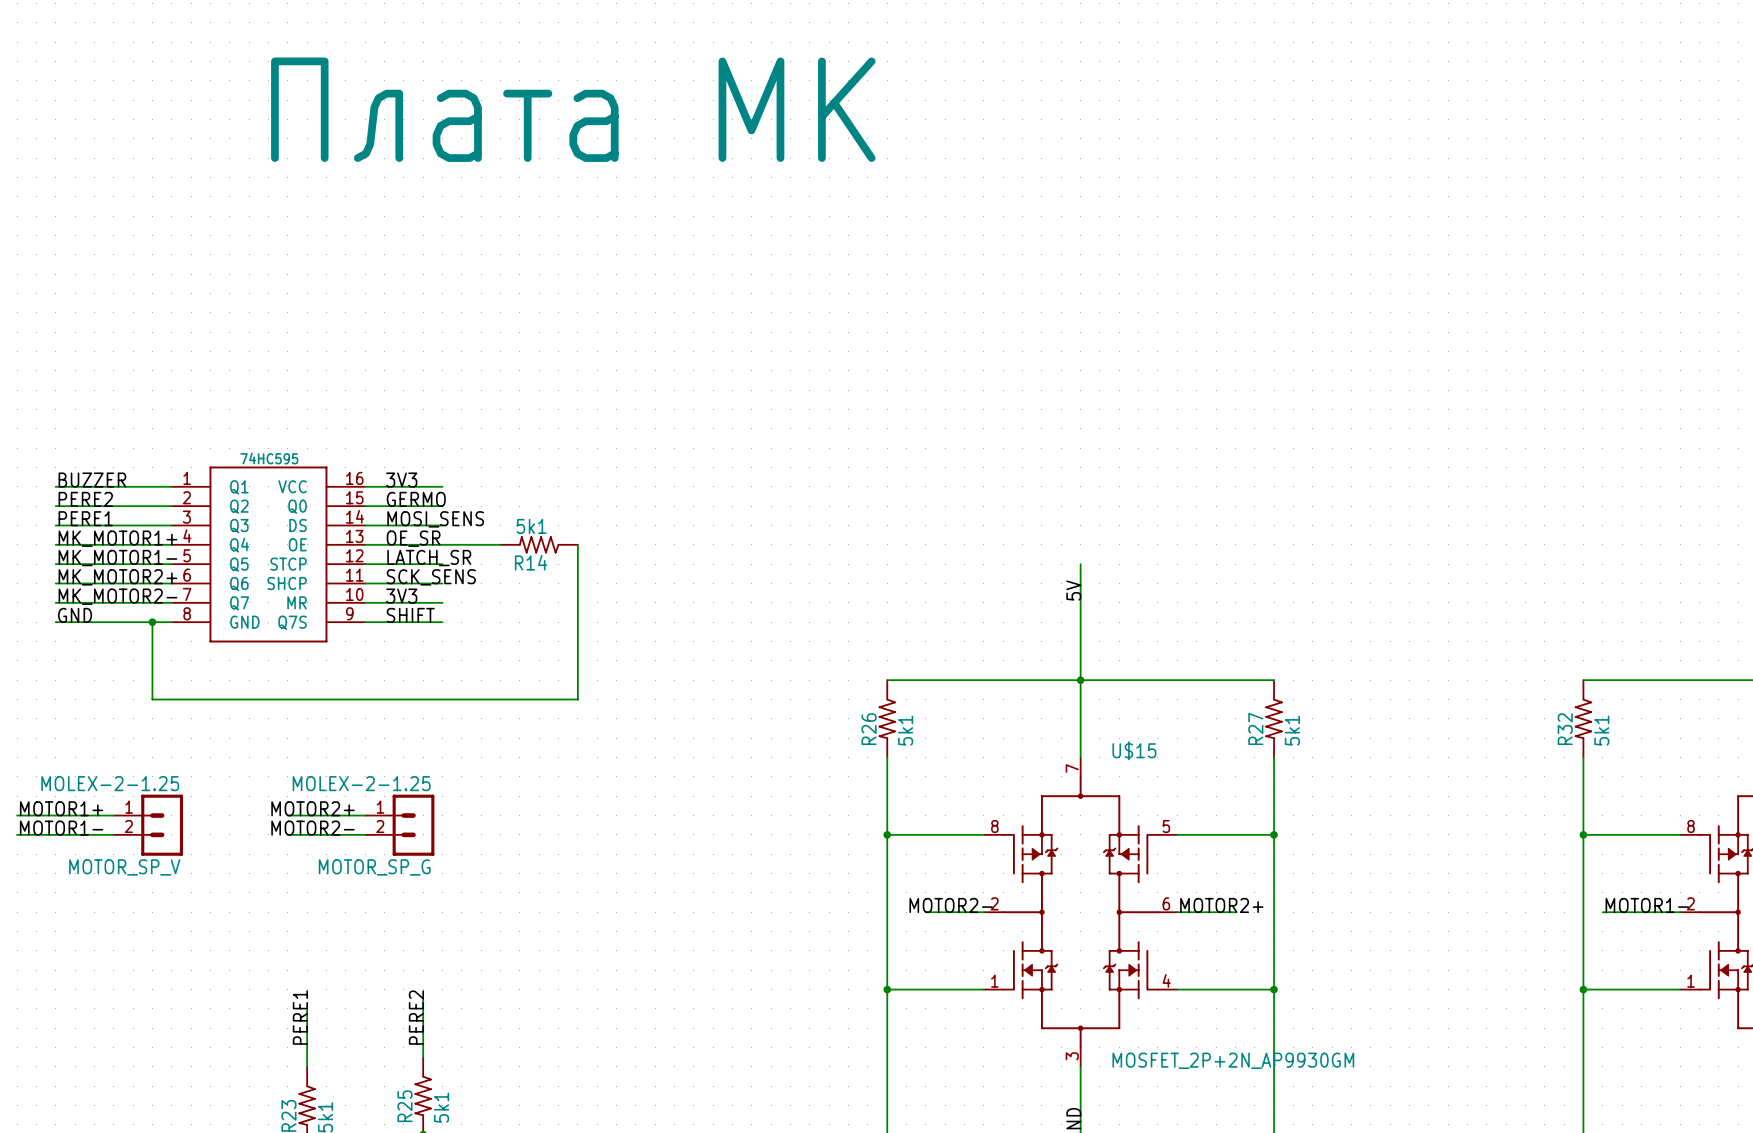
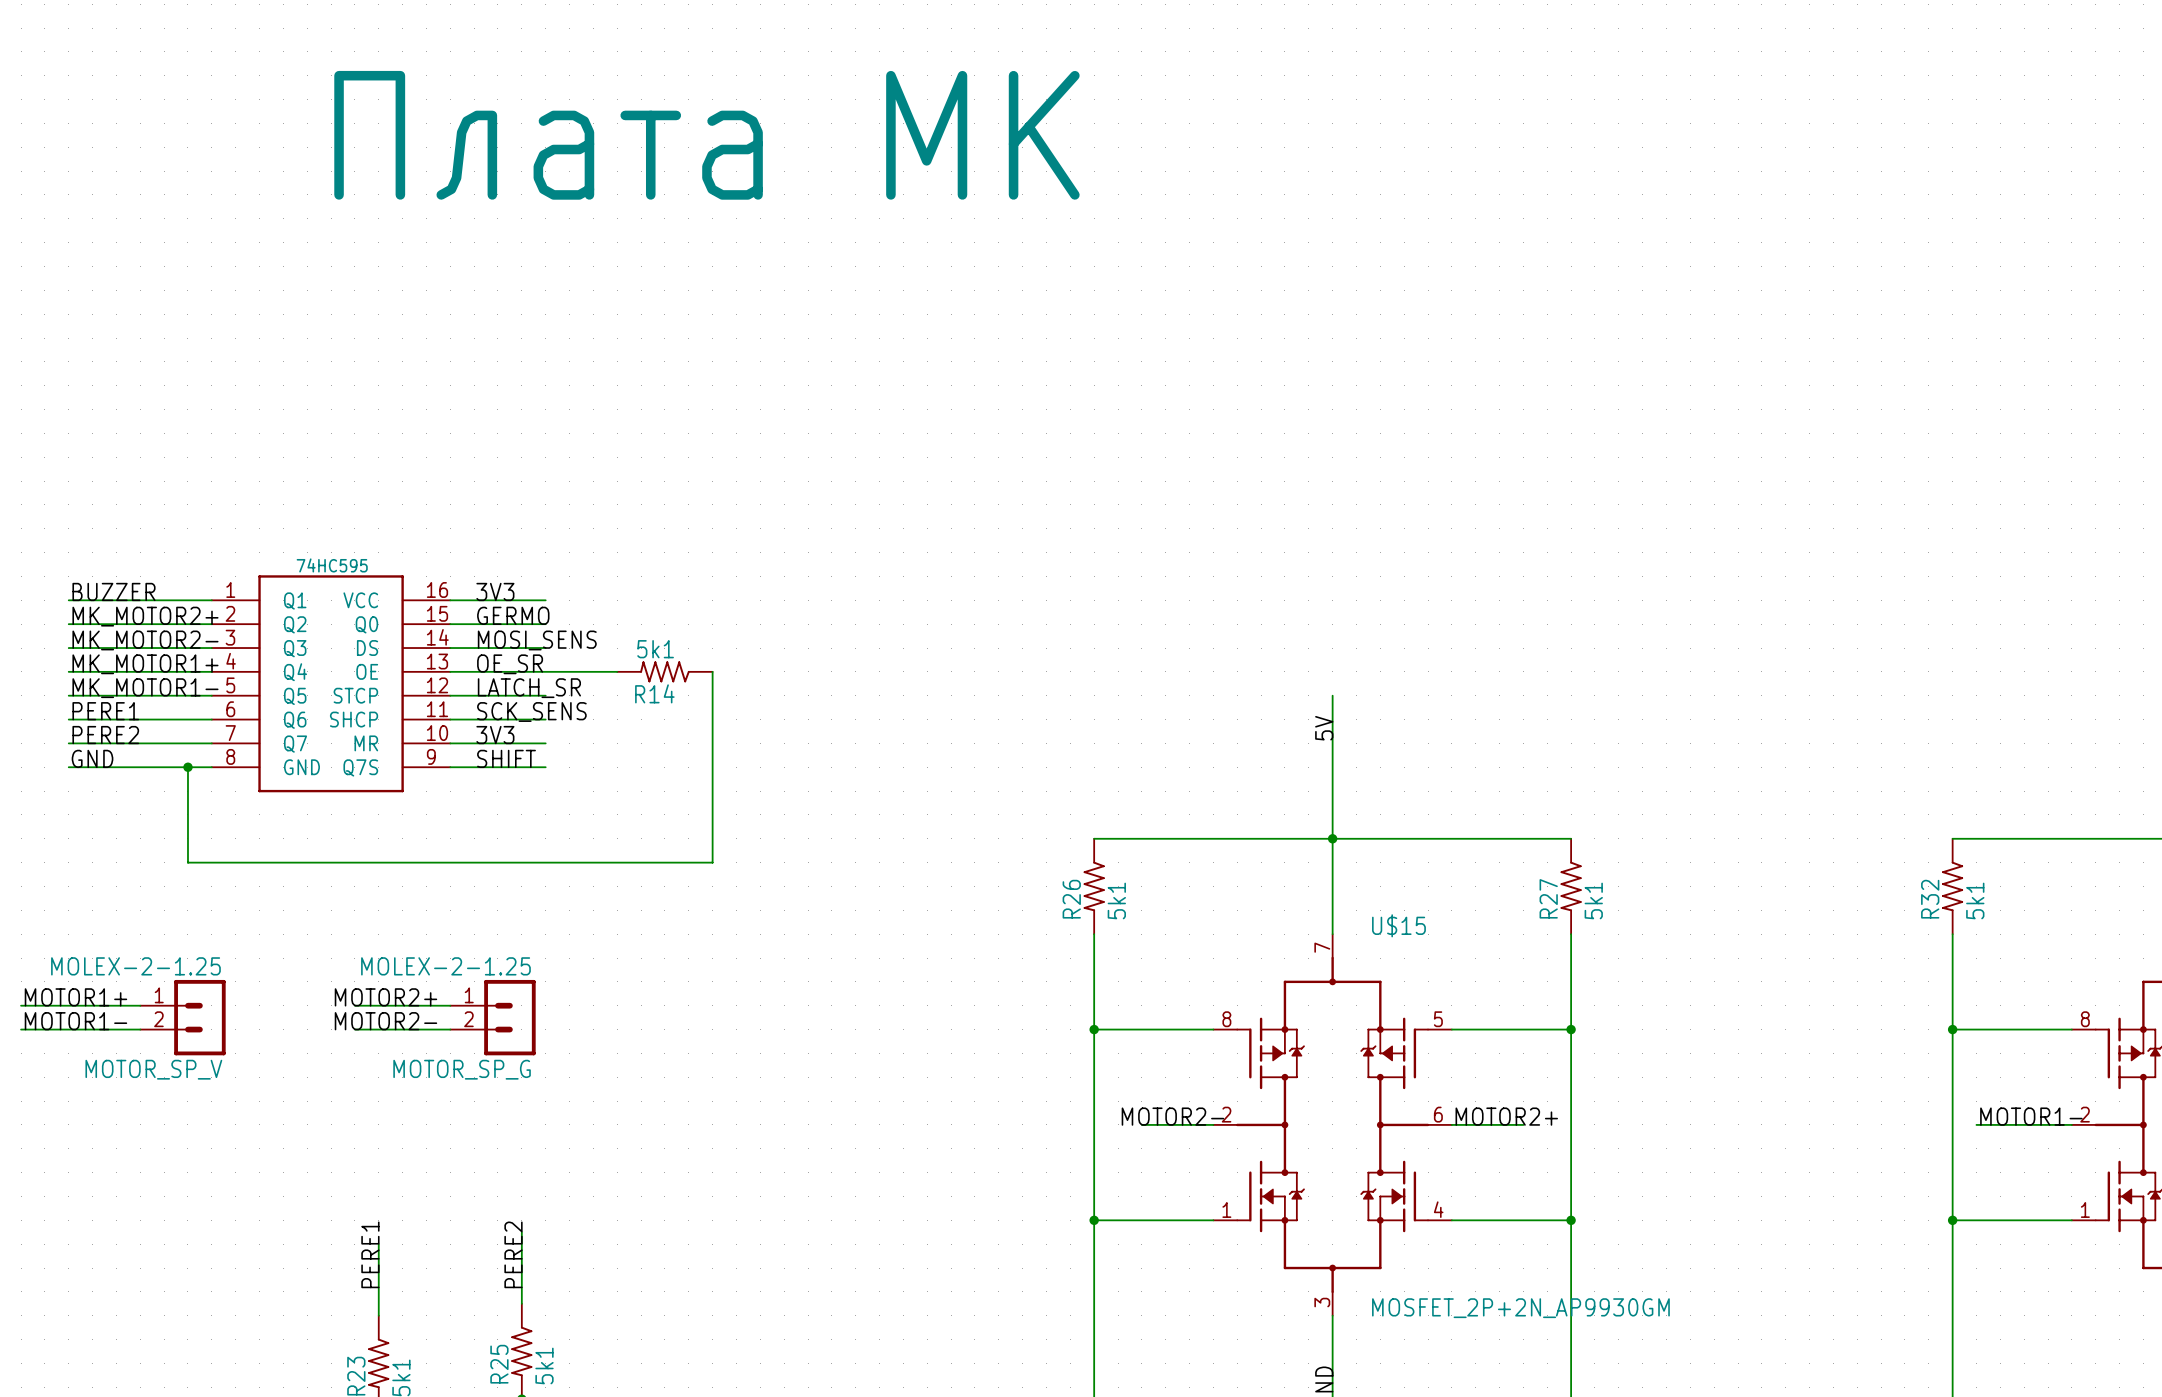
label: PERE2 (85, 499) -> MK_MOTOR2+ (145, 616)
label: PERE1 (85, 518) -> MK_MOTOR2- (145, 640)
label: MK_MOTOR2+ (117, 577) -> PERE1 (105, 711)
label: MK_MOTOR2- (117, 596) -> PERE2 (105, 735)

